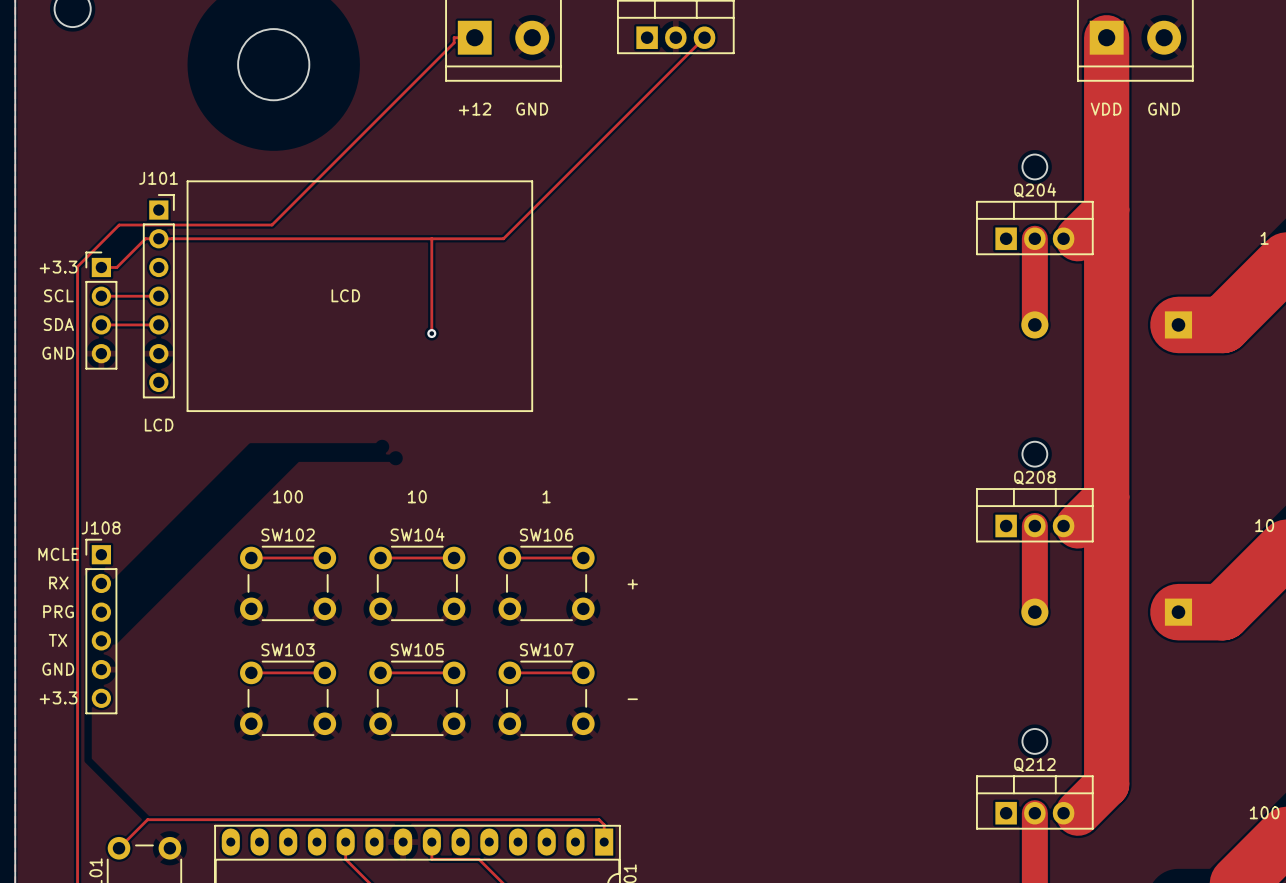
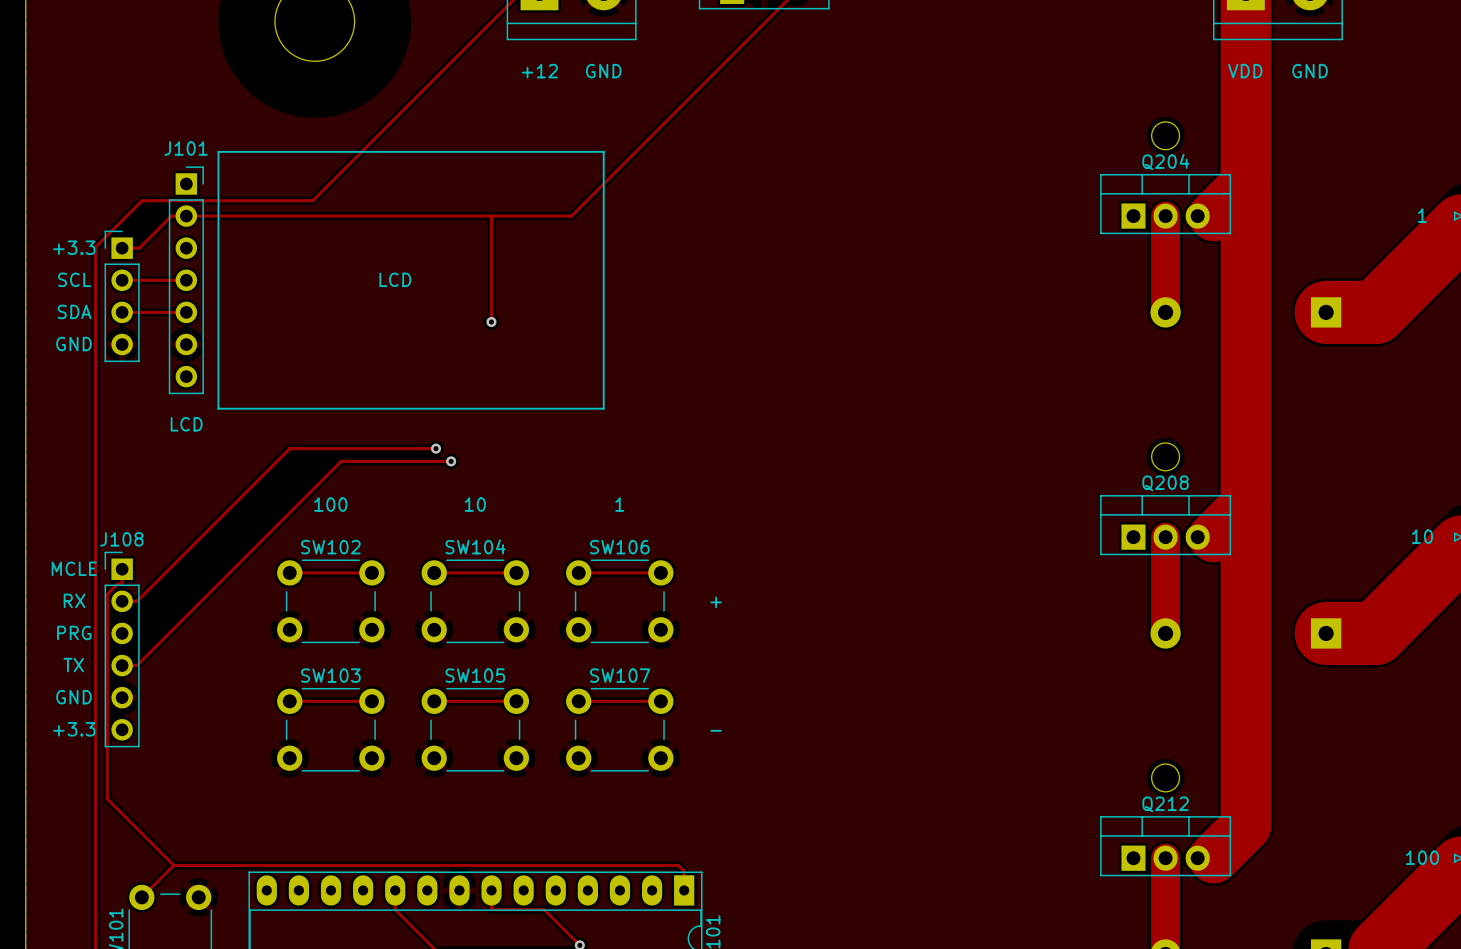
track: none -> (435, 448) (289, 448) (136, 601) (122, 601)
via: none -> (435, 448)
track: none -> (451, 461) (341, 461) (136, 665) (122, 665)
via: none -> (451, 461)
track: none -> (122, 569) (122, 584) (117, 584) (107, 594) (107, 798) (173, 865)

